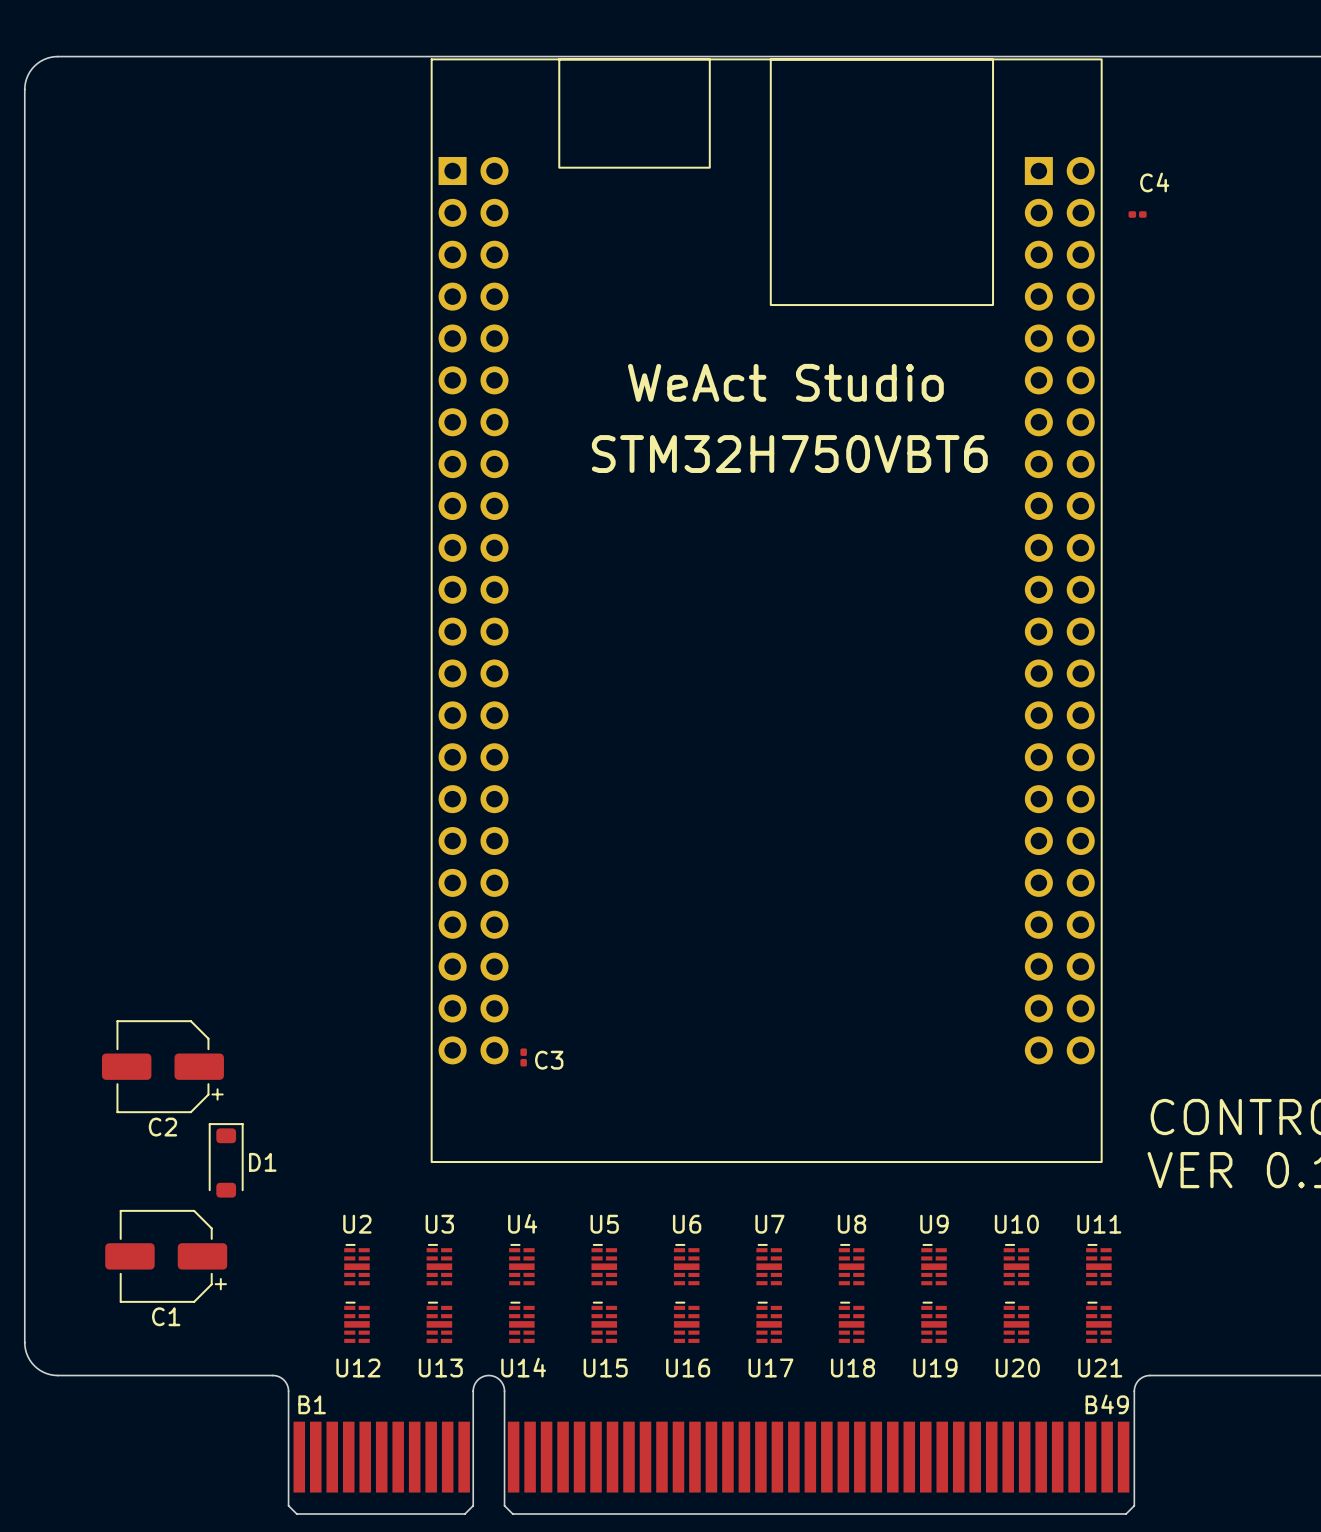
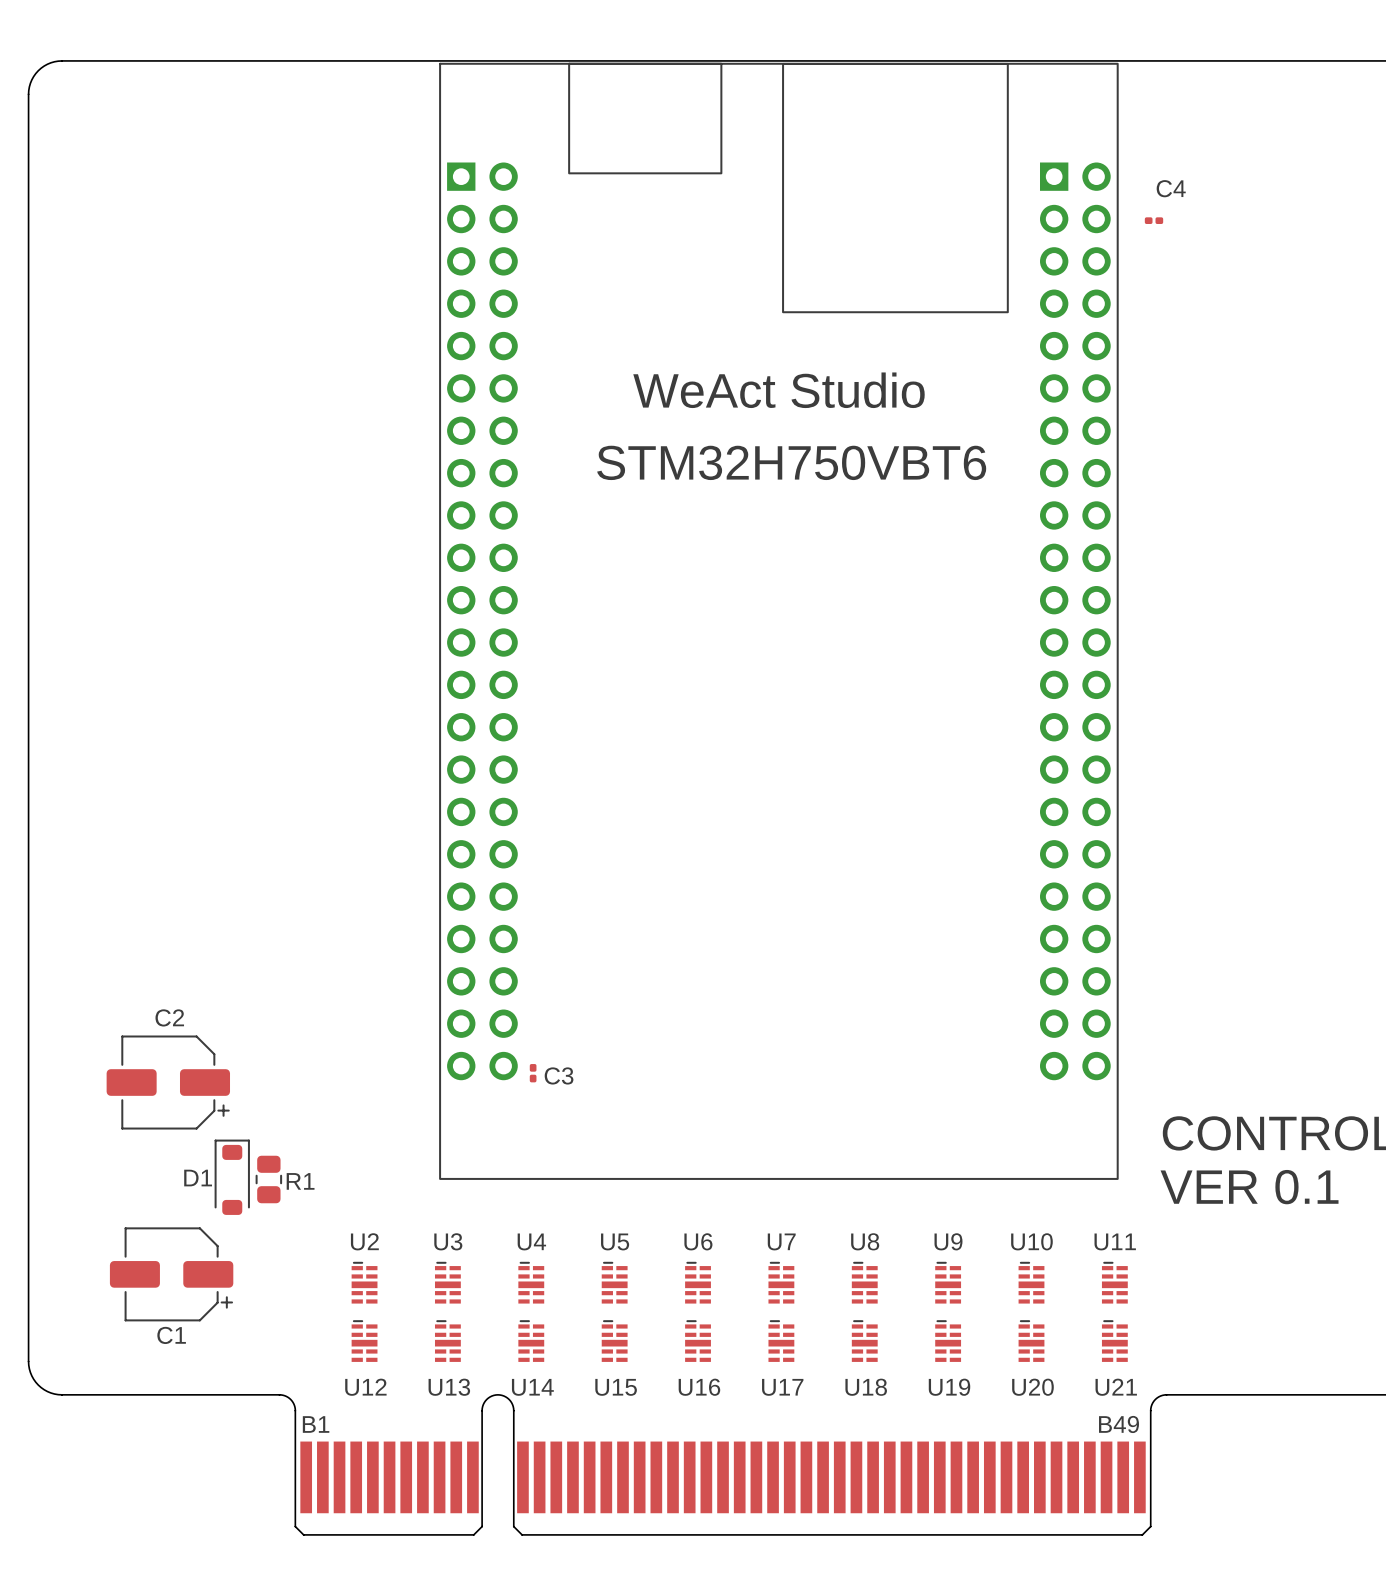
C2 name position: C2 (162, 1127) -> C2 (169, 1017)
D1 name position: D1 (262, 1162) -> D1 (198, 1178)
R1: none -> (268, 1179)

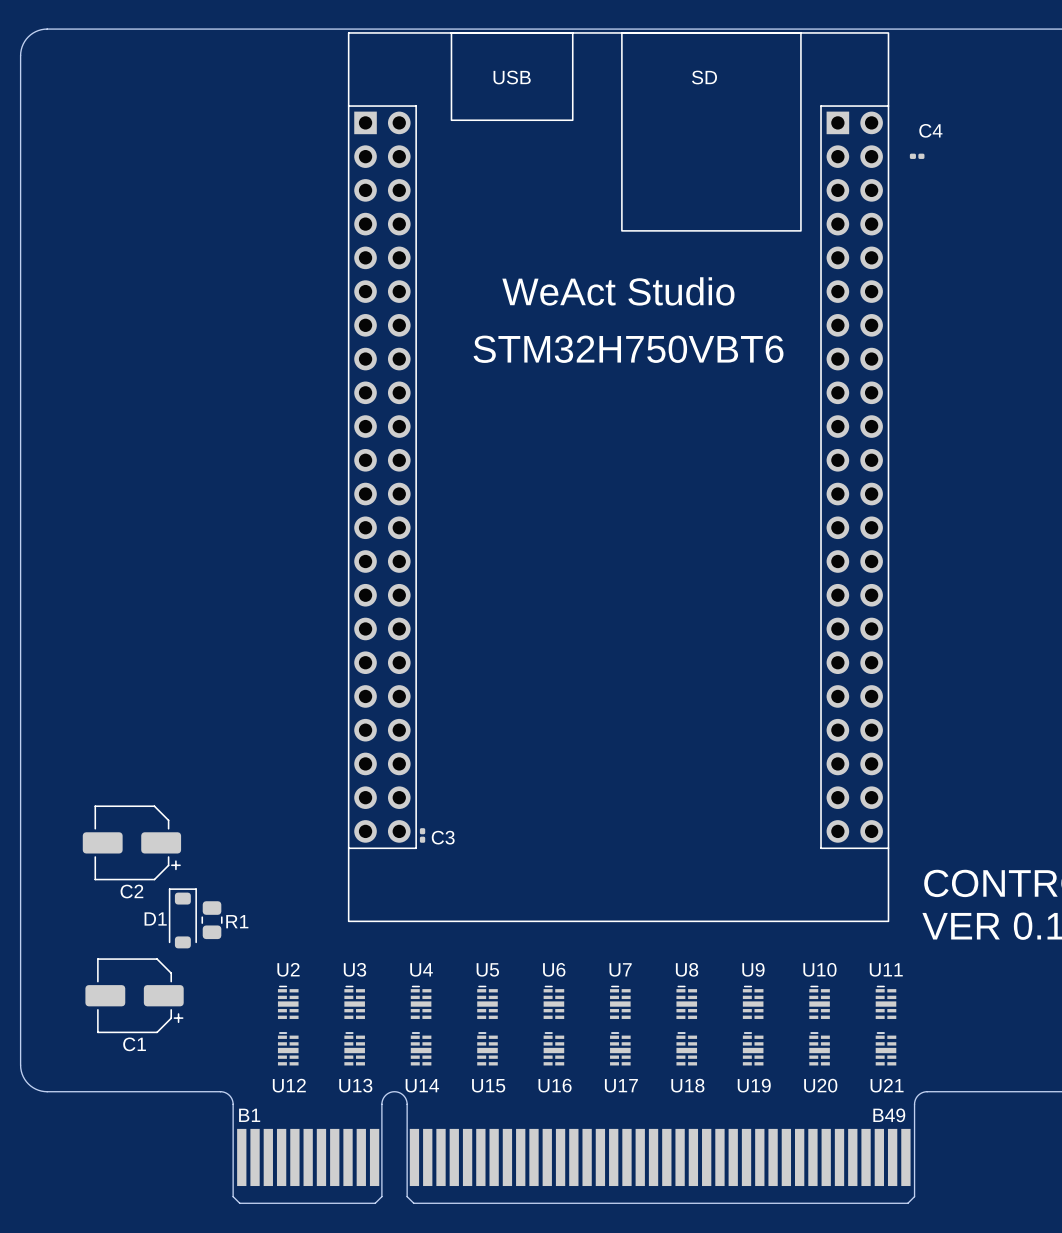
part footprint: [439, 62, 1119, 1180] -> [347, 32, 890, 923]
C2 name position: C2 (169, 1017) -> C2 (131, 891)

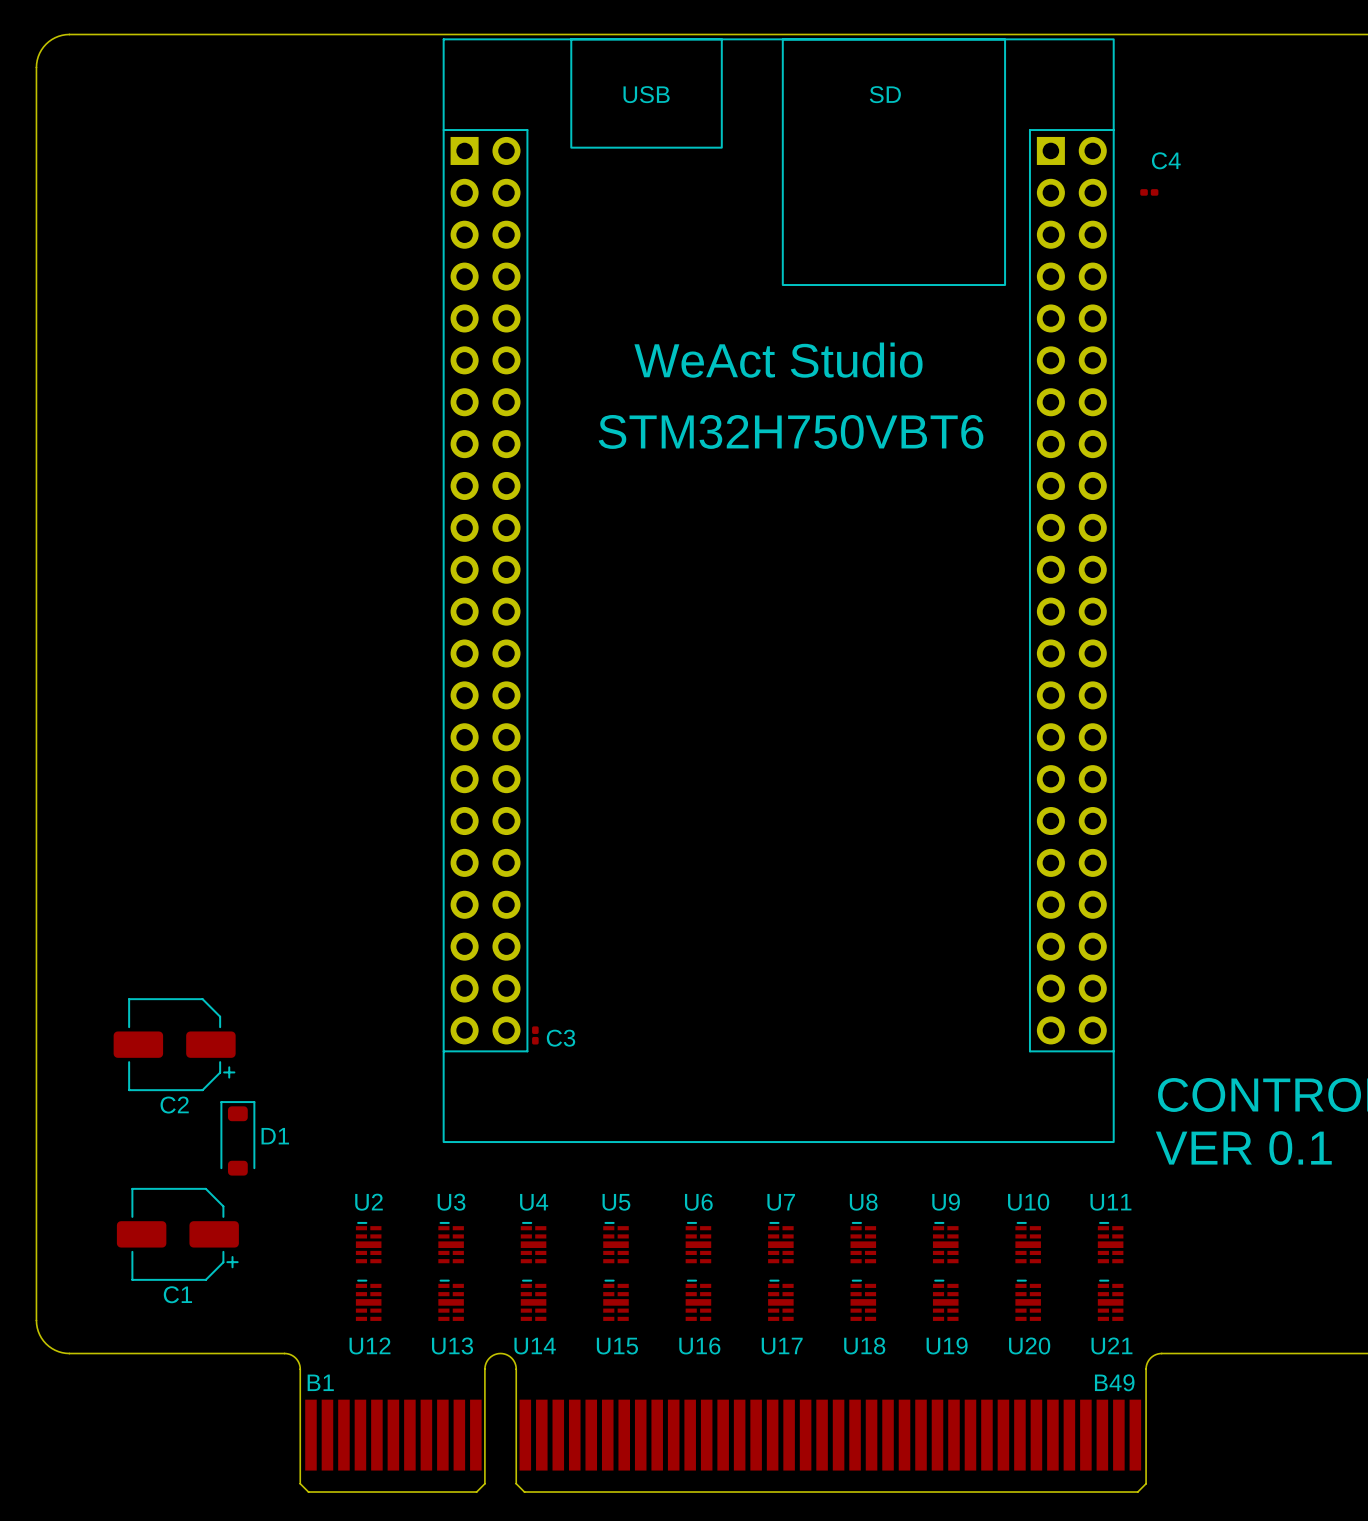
D1 name position: D1 (155, 918) -> D1 (275, 1136)
R1: (212, 920) -> none

